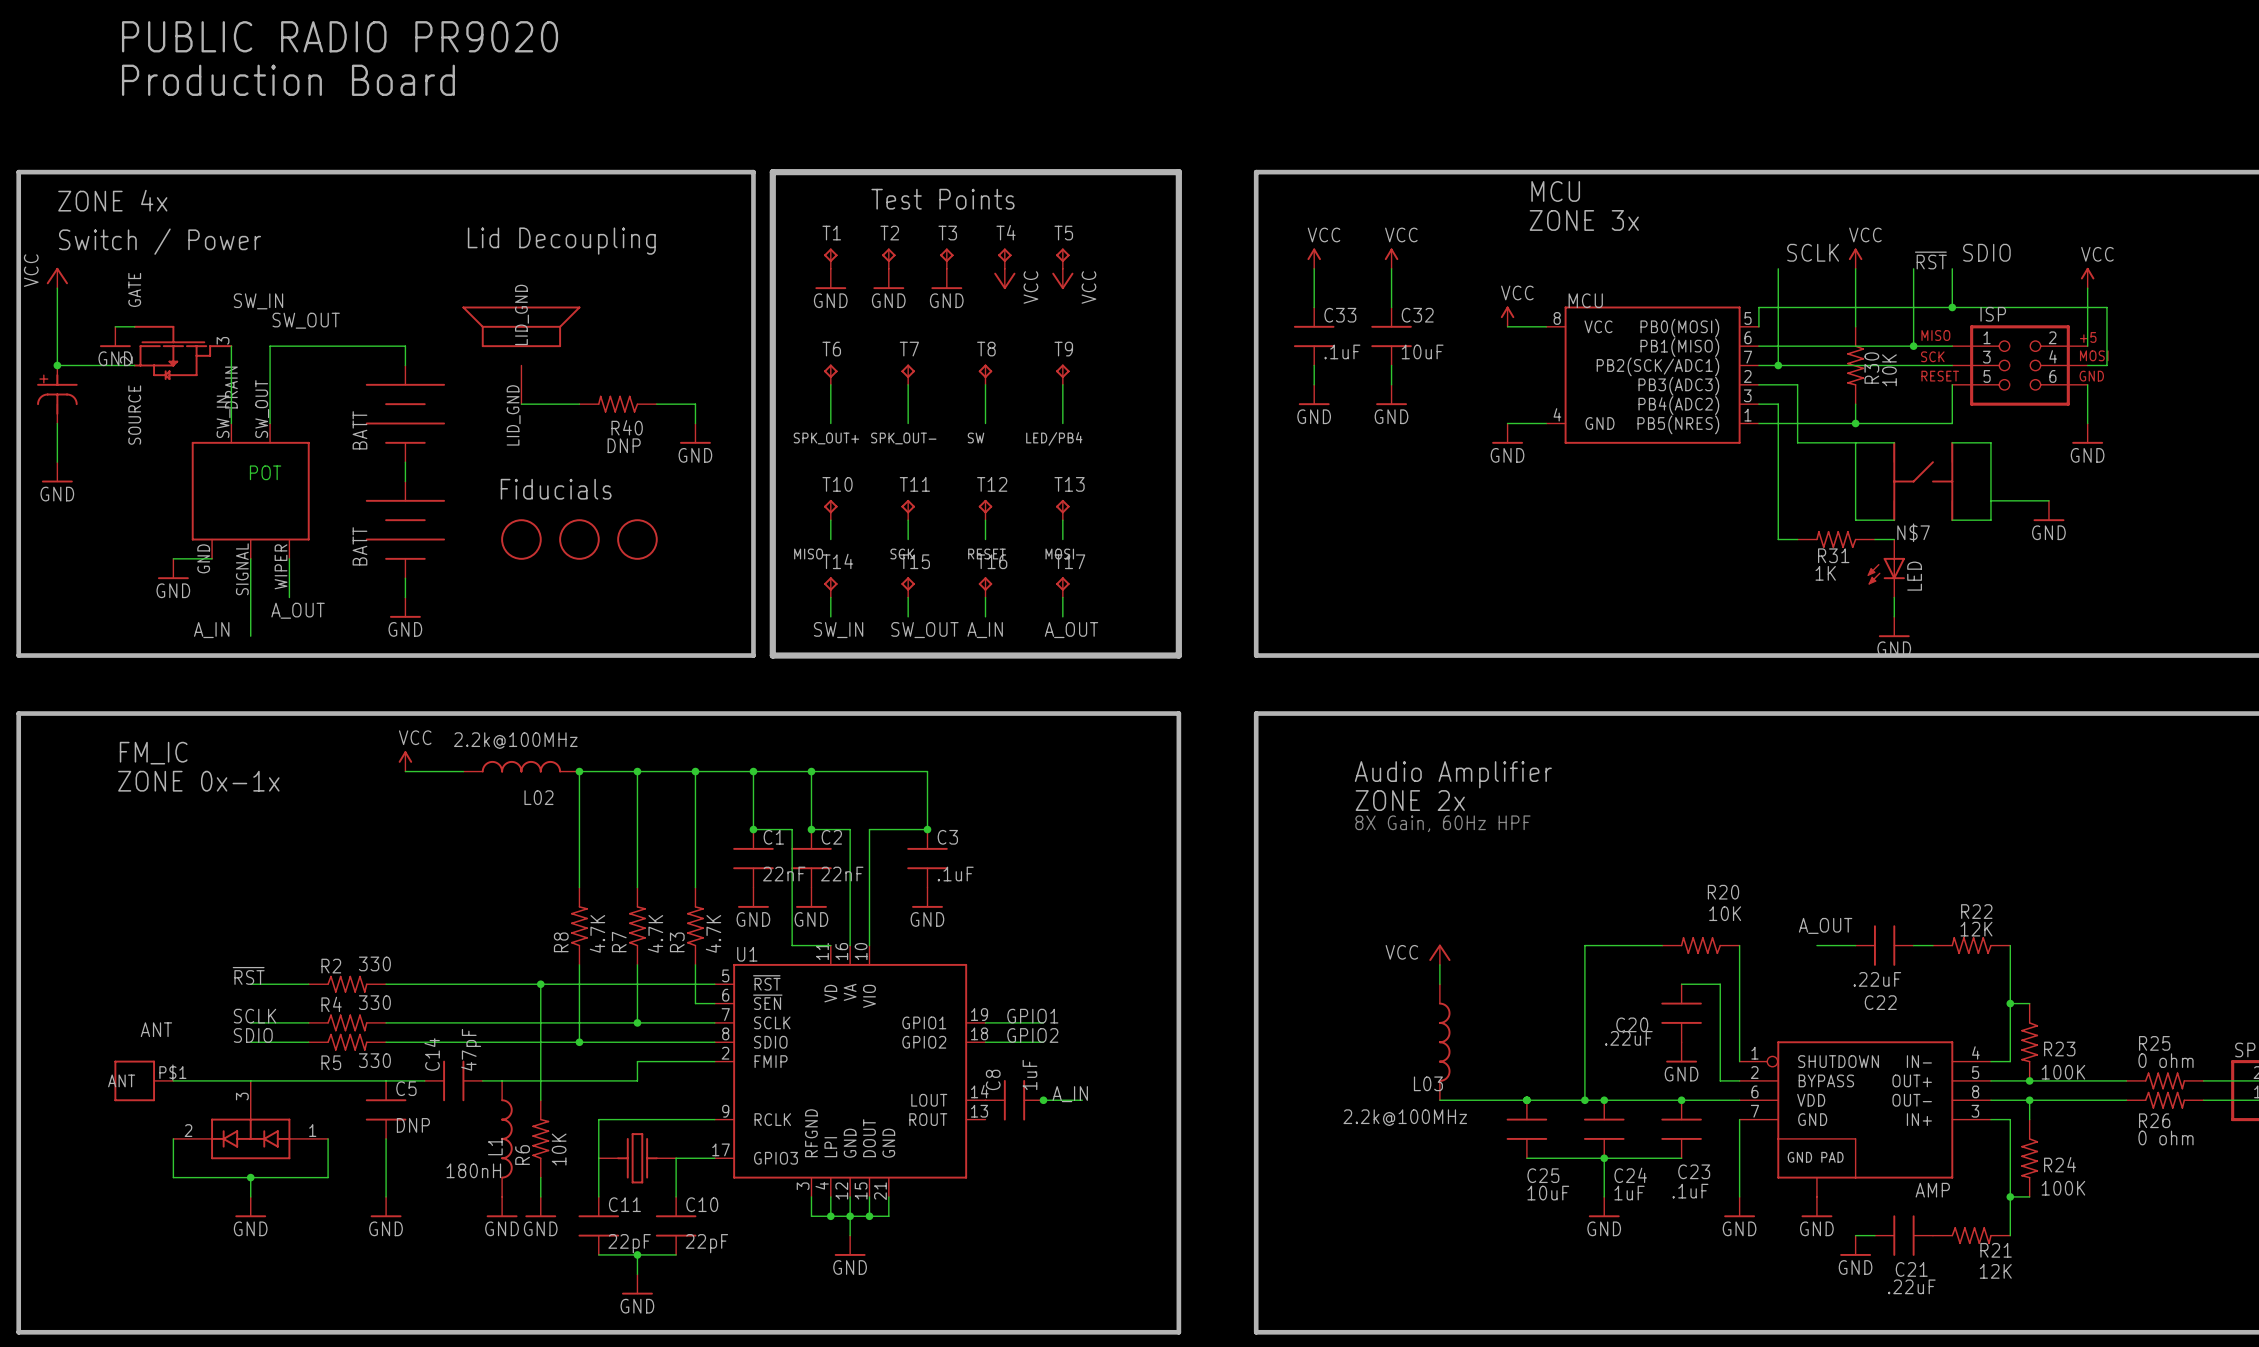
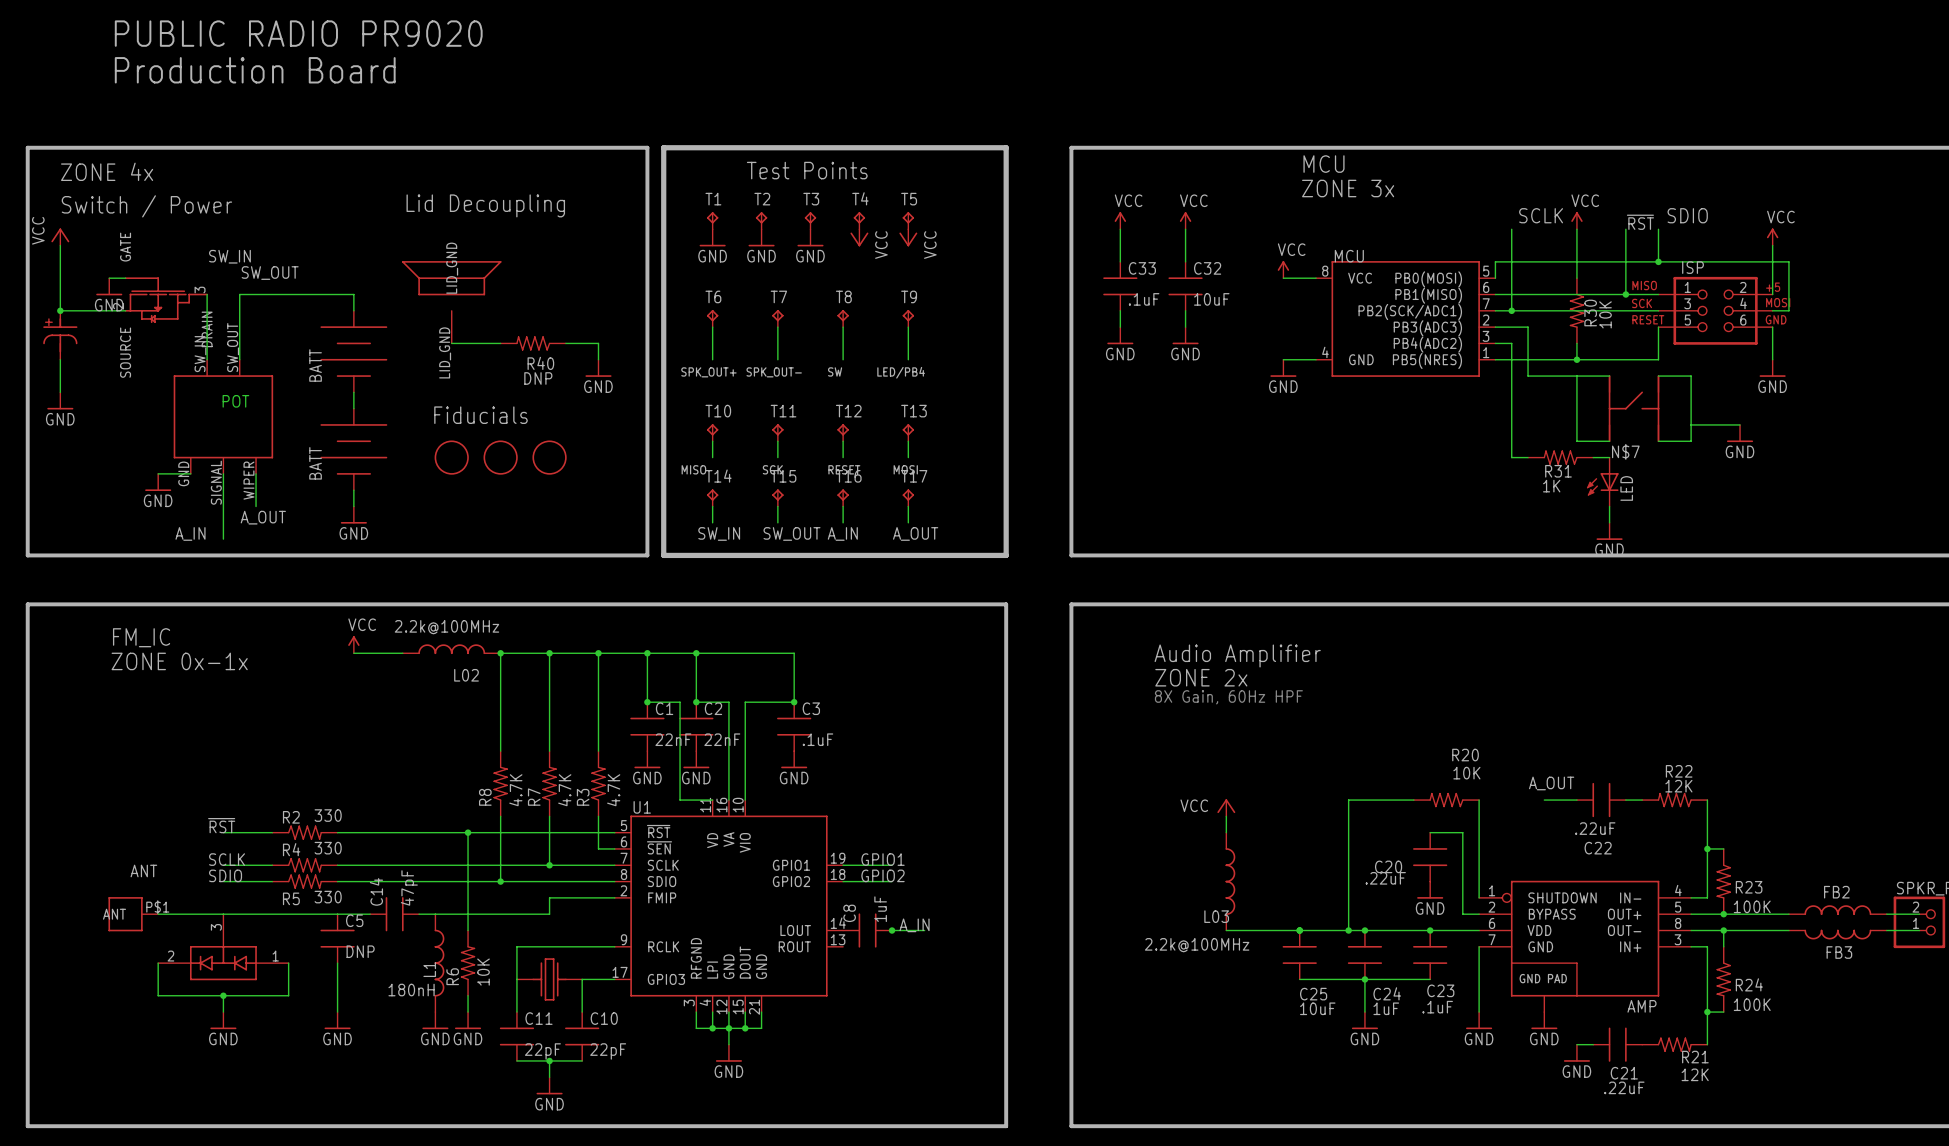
FB2: none -> (1837, 910)
R25: 0 ohm (2165, 1080) -> none
R26: 0 ohm (2165, 1100) -> none
FB3: none -> (1837, 934)

